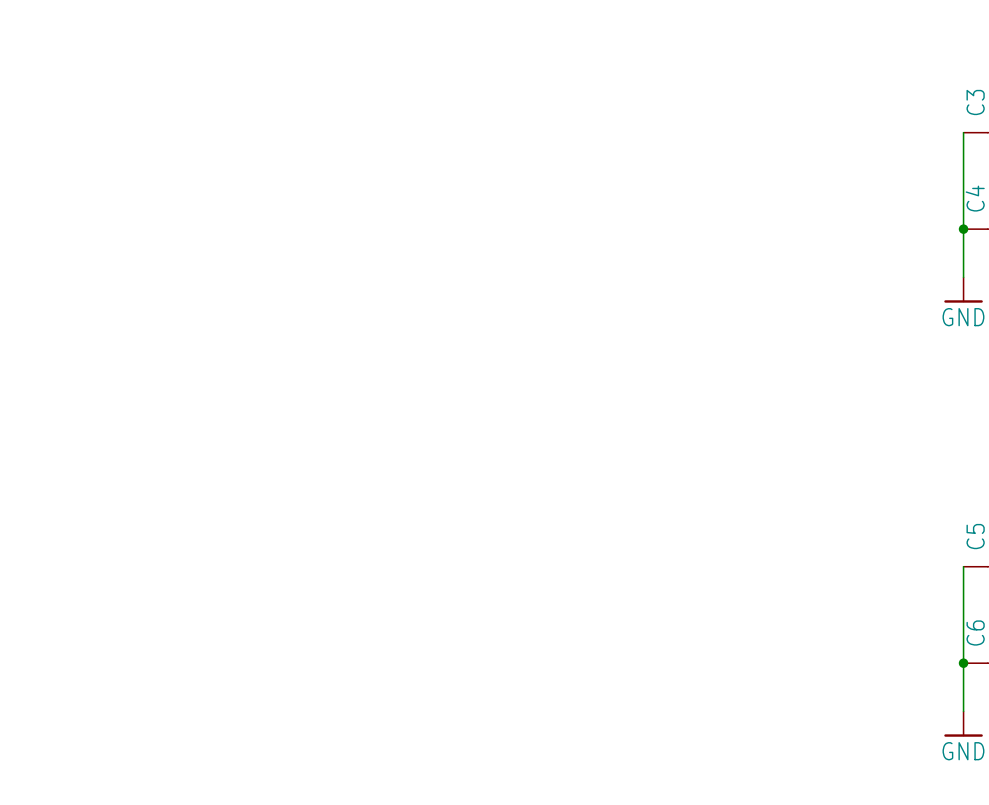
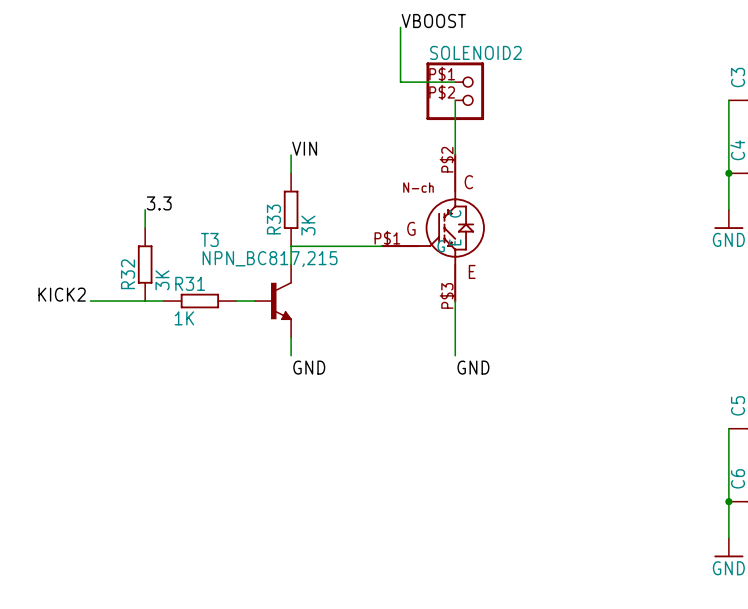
label: none -> VBOOST (433, 21)
wire: none -> (400, 27) (400, 82) (455, 82)
SOLENOID2: none -> (455, 91)
wire: none -> (455, 100) (455, 155)
label: none -> VIN (304, 148)
wire: none -> (291, 155) (291, 173)
label: none -> 3.3 (159, 203)
wire: none -> (145, 209) (145, 228)
R33: none -> 3K (291, 209)
part: none -> (432, 228)
wire: none -> (382, 246) (291, 246) (291, 264)
R32: none -> 3K (145, 264)
label: none -> KICK2 (62, 294)
wire: none -> (90, 301) (163, 301)
R31: none -> 1K (199, 301)
wire: none -> (236, 301) (254, 301)
T3: none -> NPN_BC817,215 (273, 301)
wire: none -> (455, 301) (455, 355)
wire: none -> (291, 337) (291, 355)
label: none -> GND (309, 367)
label: none -> GND (473, 367)

